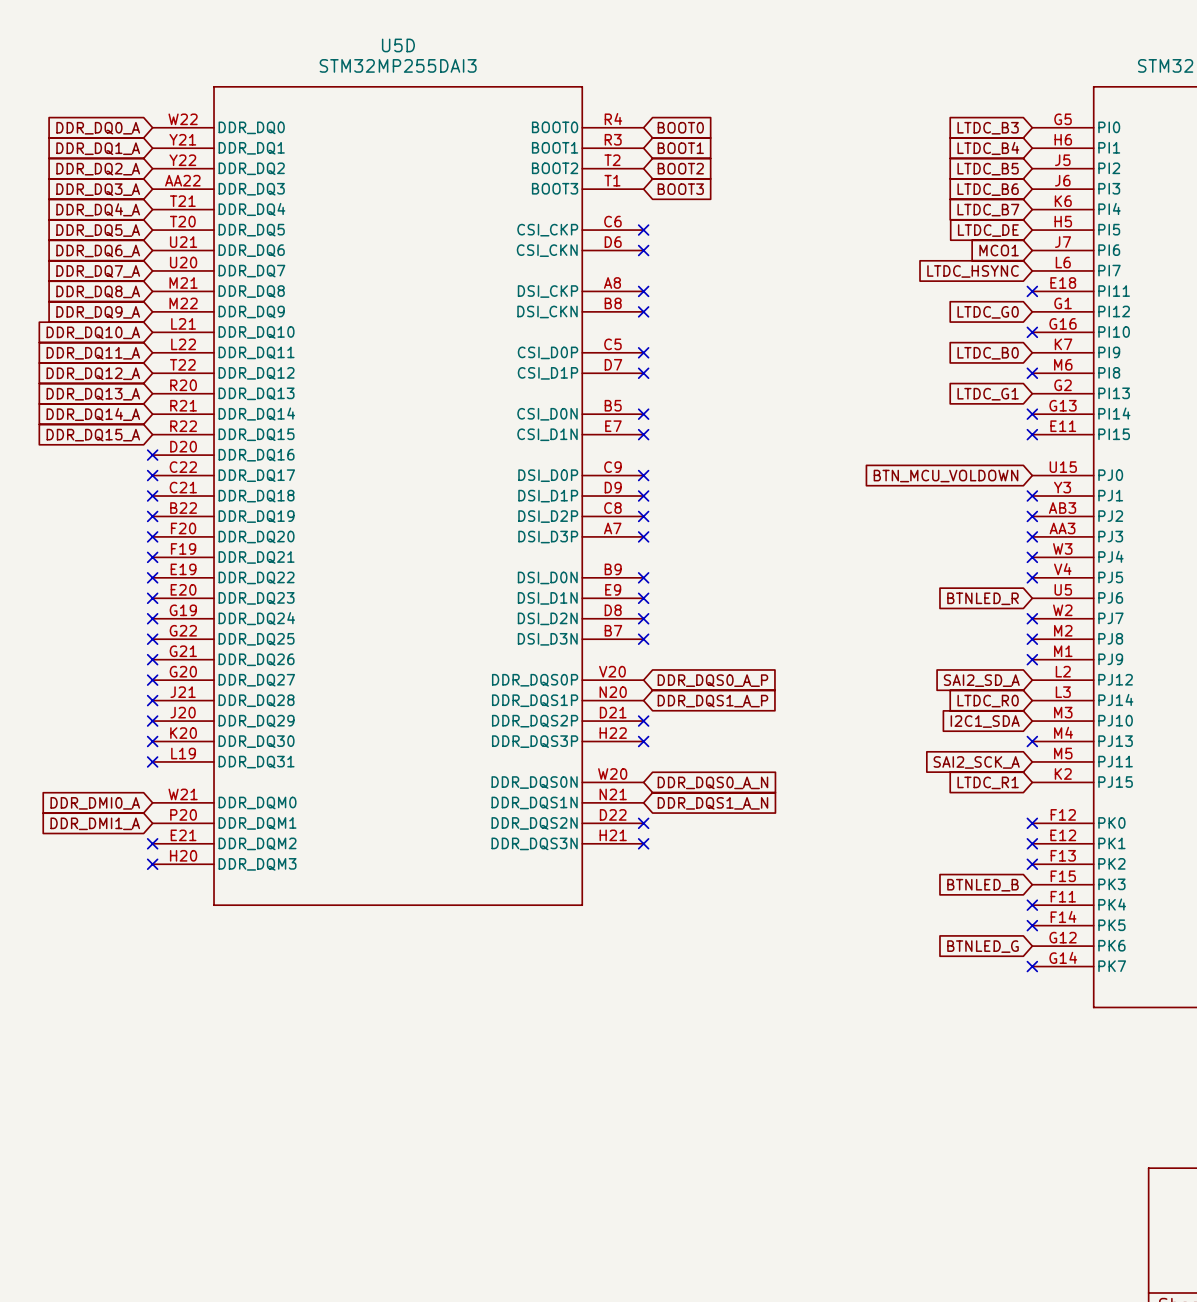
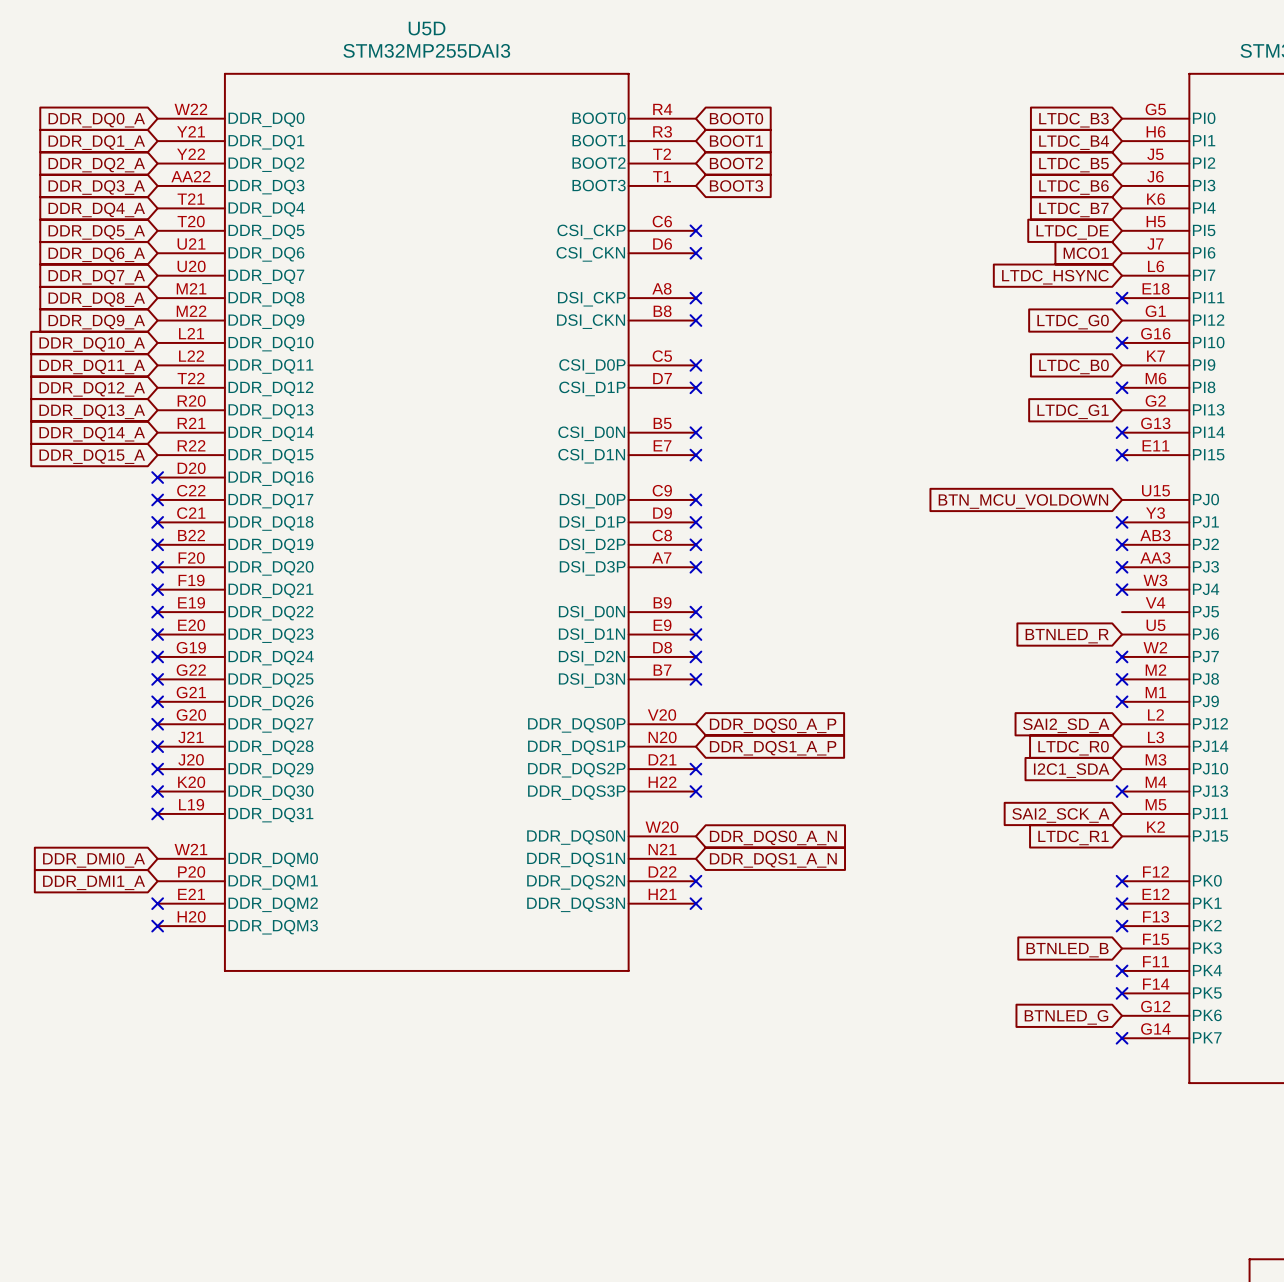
no-connect mark: (1032, 577) -> none

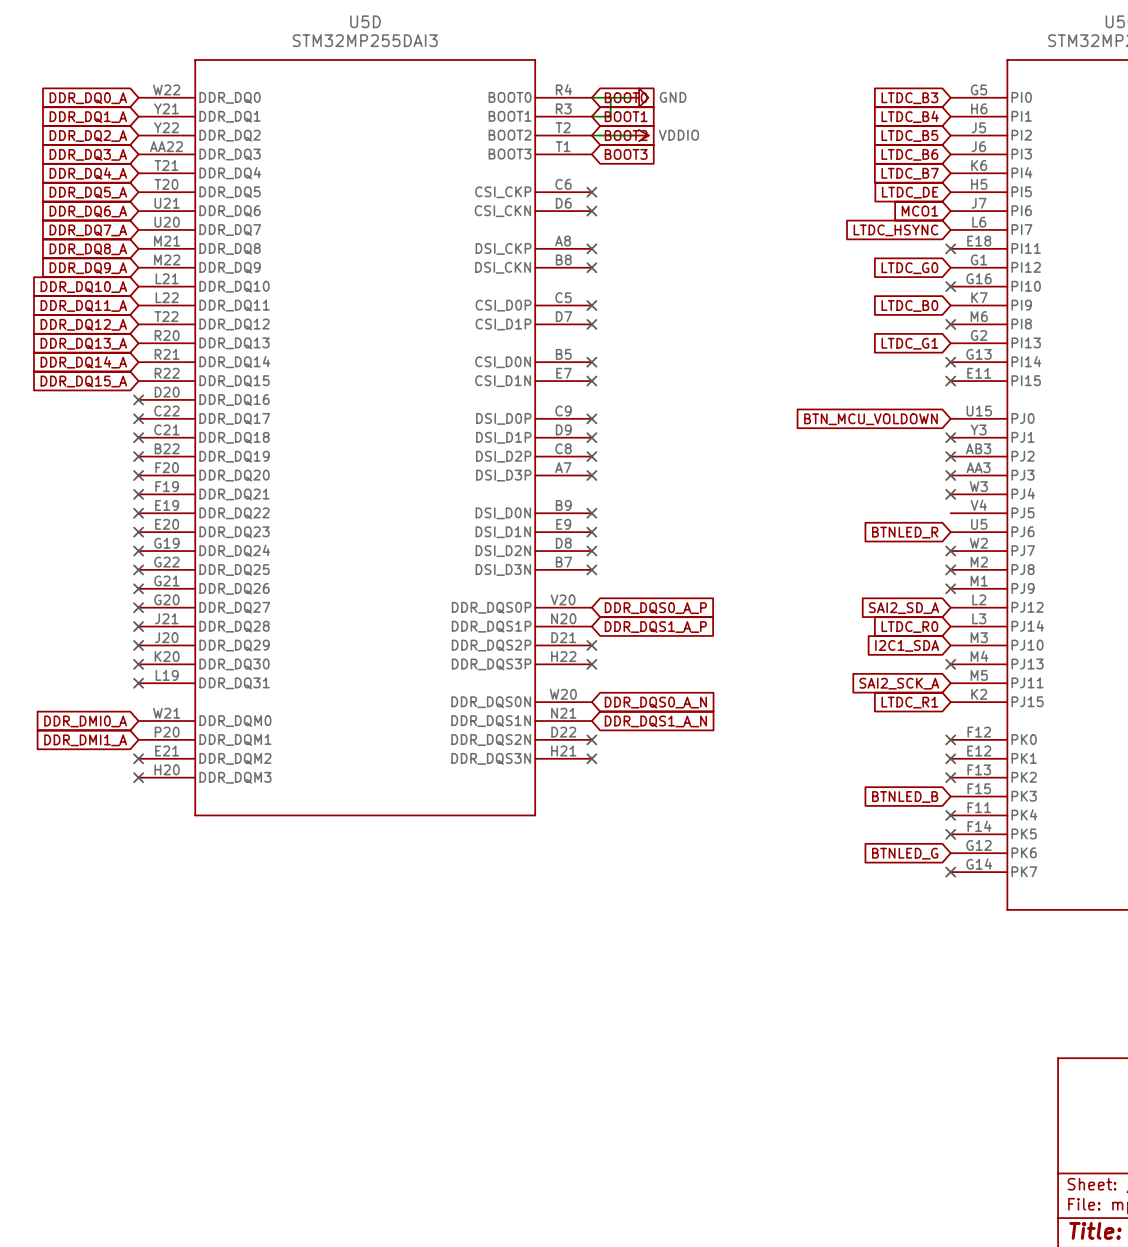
wire: none -> (591, 97) (629, 97)
wire: none -> (610, 97) (610, 116) (591, 116)
power symbol: none -> GND (639, 97)
wire: none -> (591, 135) (629, 135)
power symbol: none -> VDDIO (639, 135)

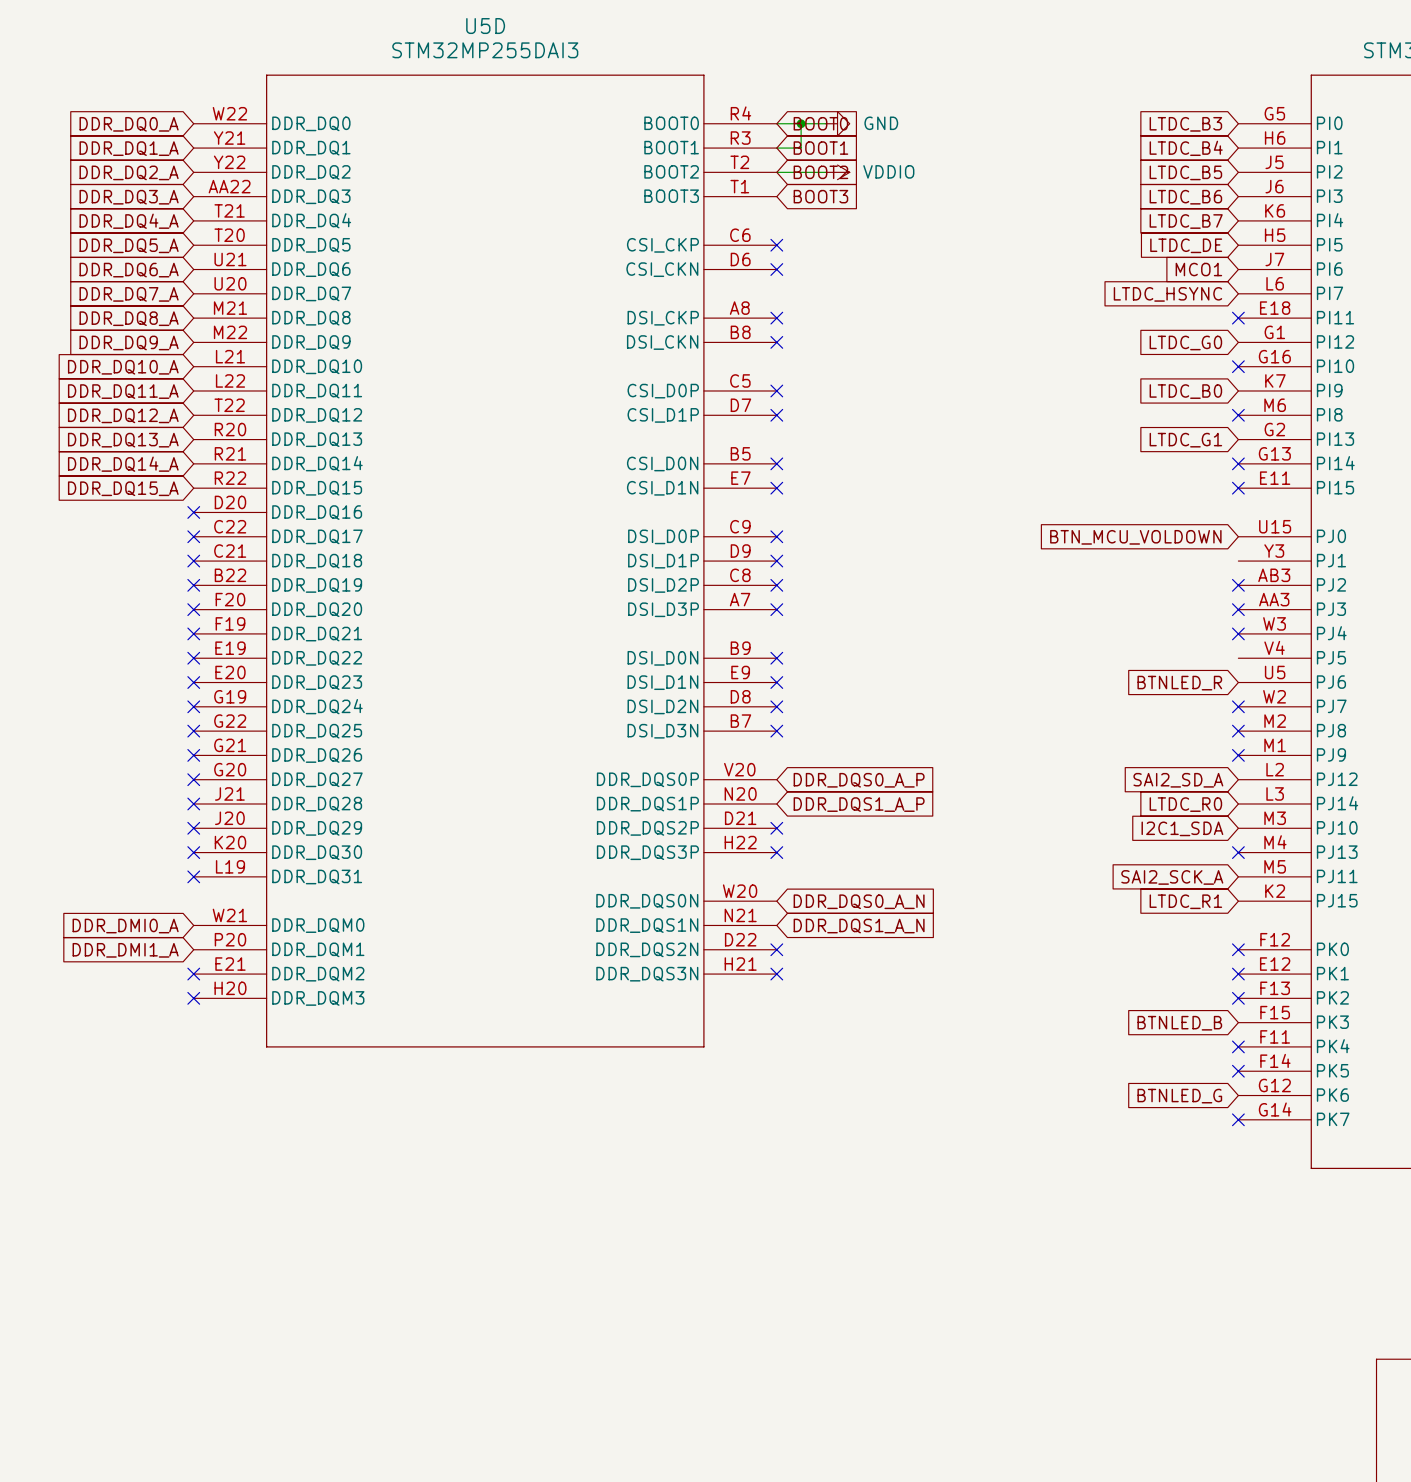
junction: none -> (801, 123)
no-connect mark: (950, 437) -> none

